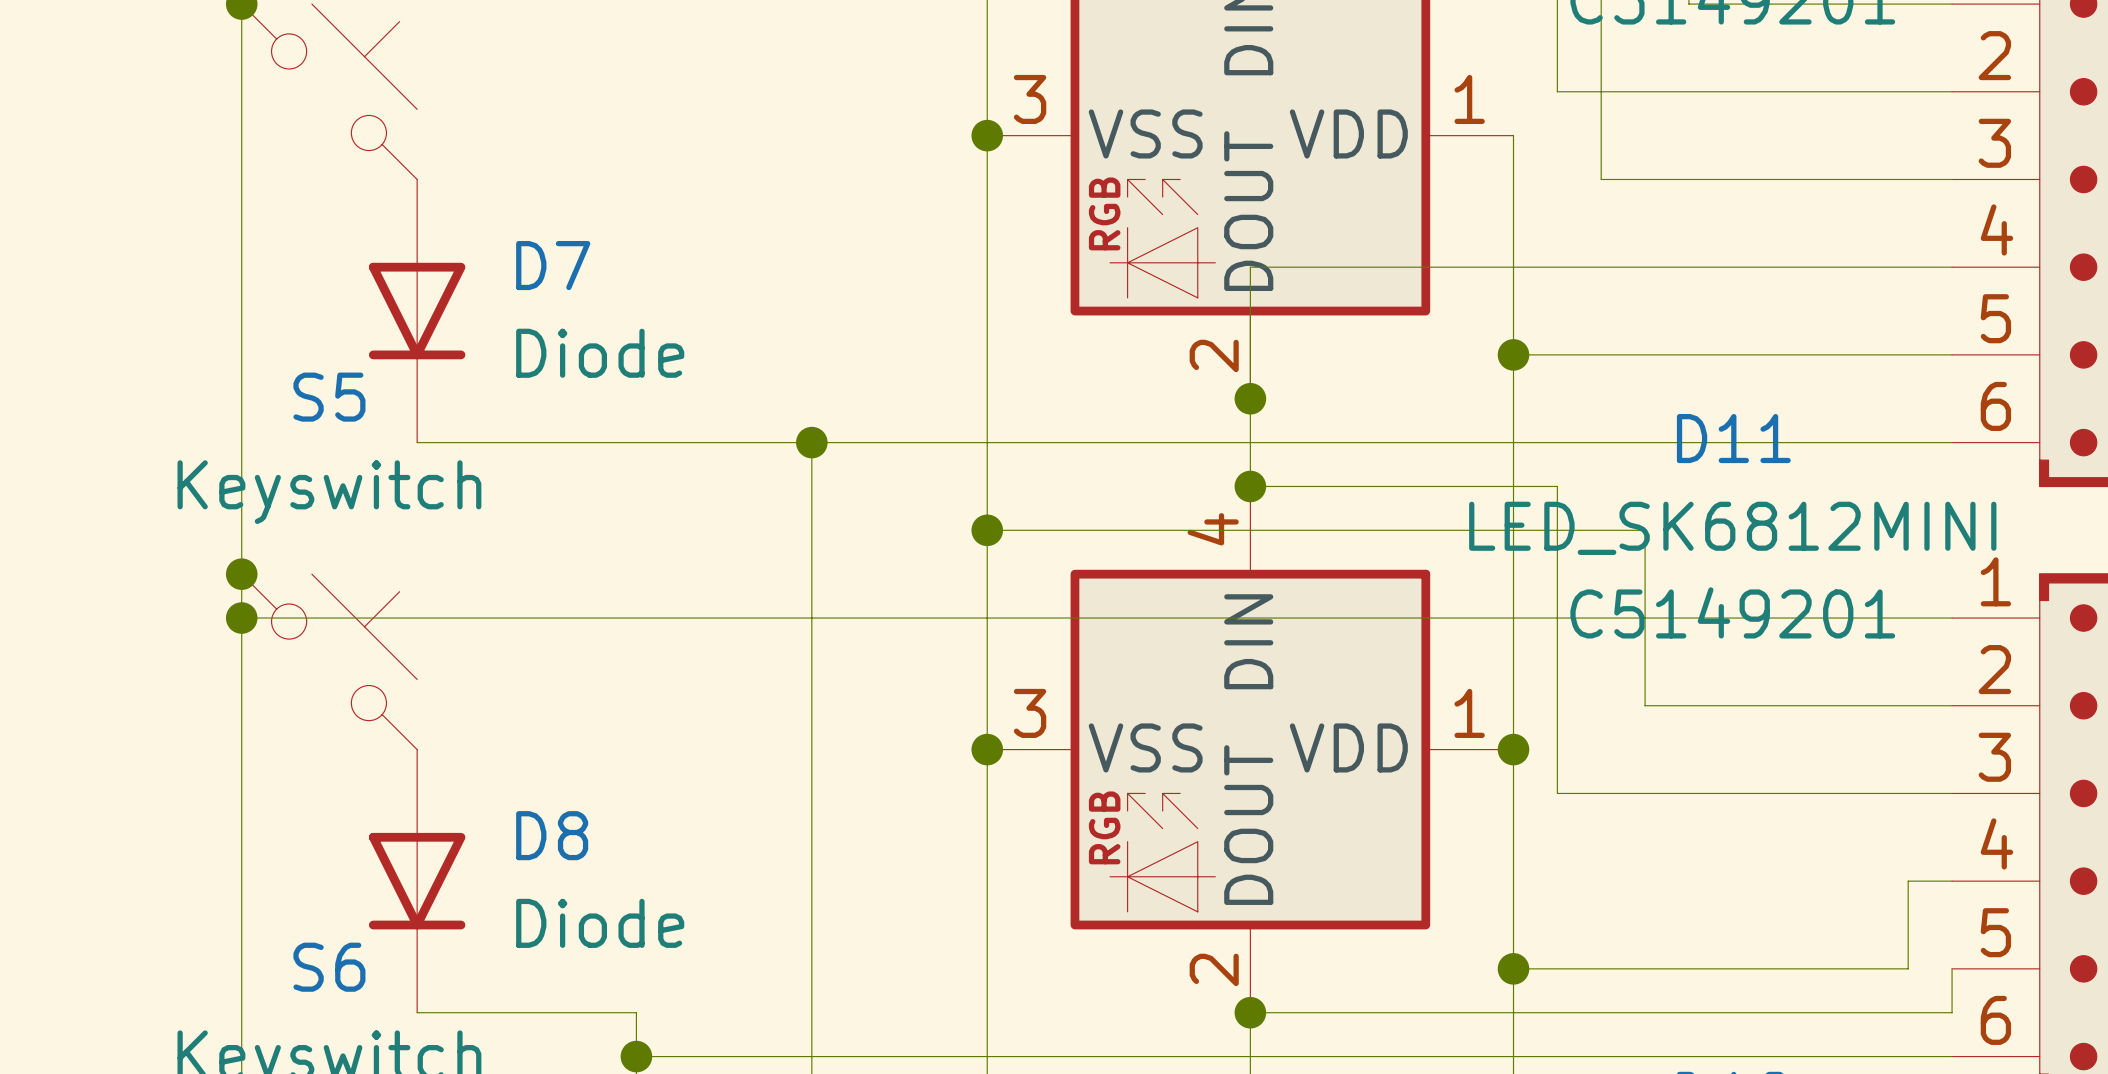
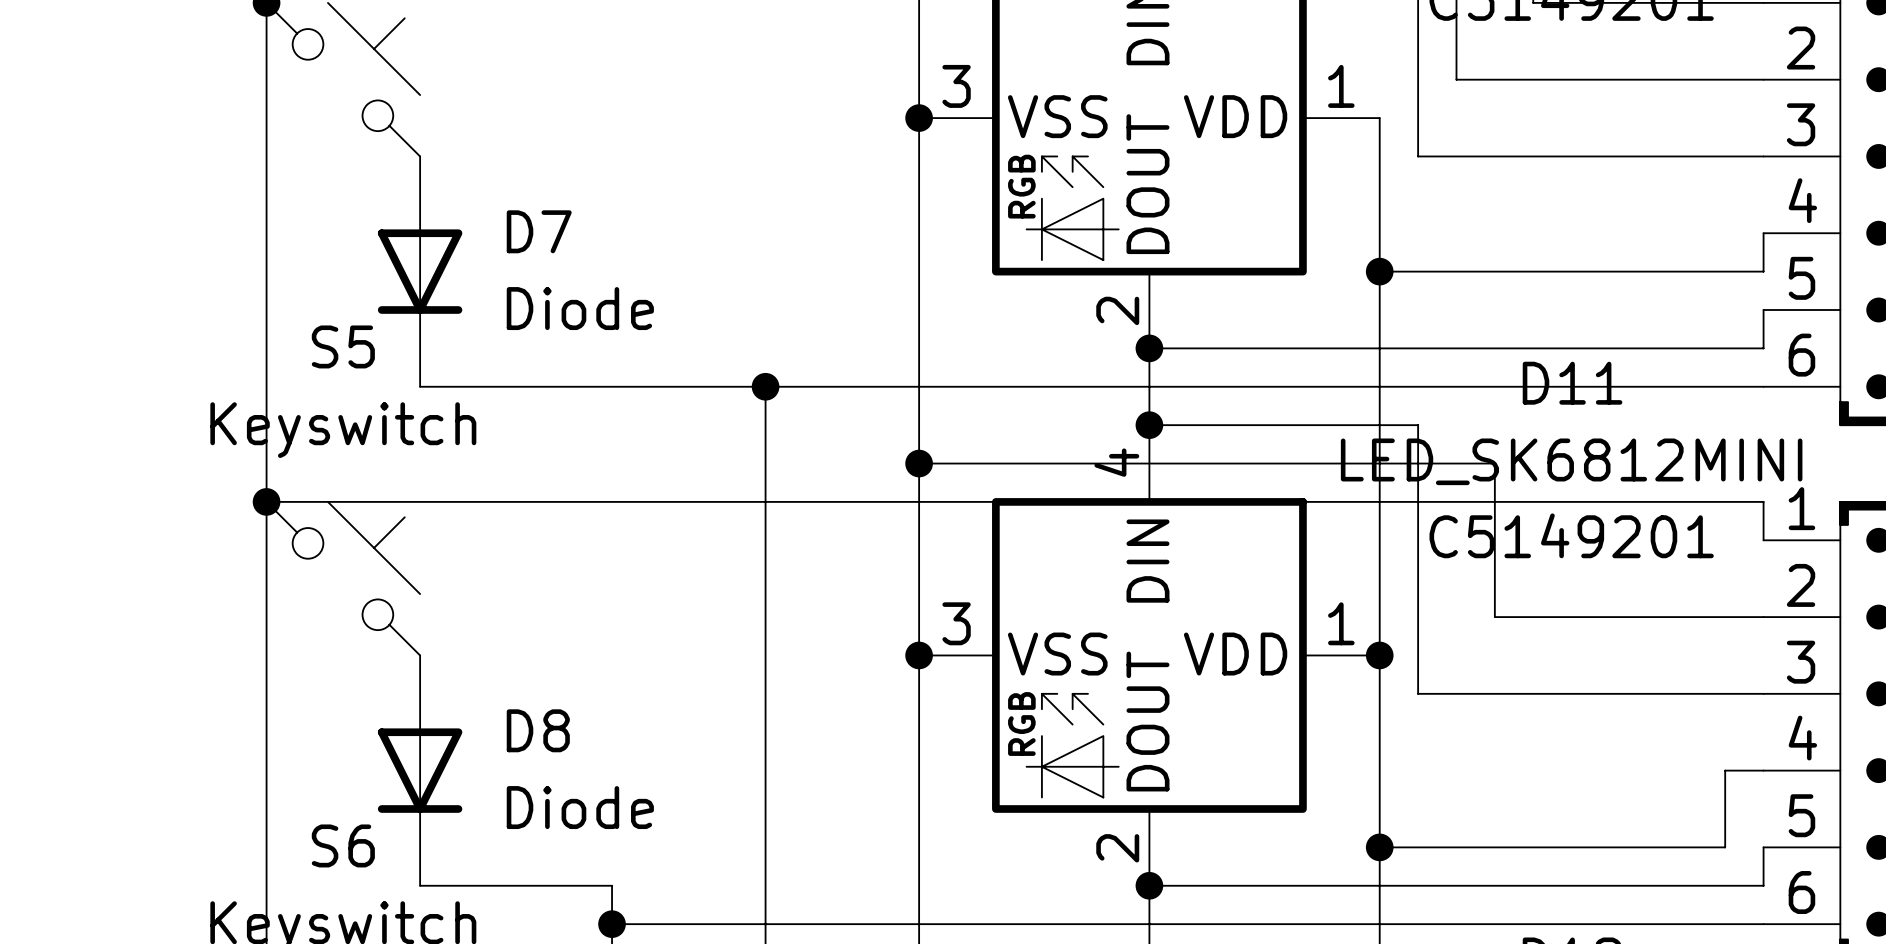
wire: (1557, 91) (1601, 91) (1601, 179) -> (1418, 79) (1418, 156) (1456, 156)
wire: (1952, 267) (1250, 267) (1250, 398) -> (1763, 310) (1763, 348) (1149, 348)
wire: none -> (1763, 233) (1763, 271) (1379, 271)
wire: (1513, 354) (1952, 354) -> none
junction position: (1513, 354) -> (1379, 271)
wire: (241, 618) (1952, 618) -> (266, 501) (1763, 501) (1763, 540)
junction: (241, 618) -> none

